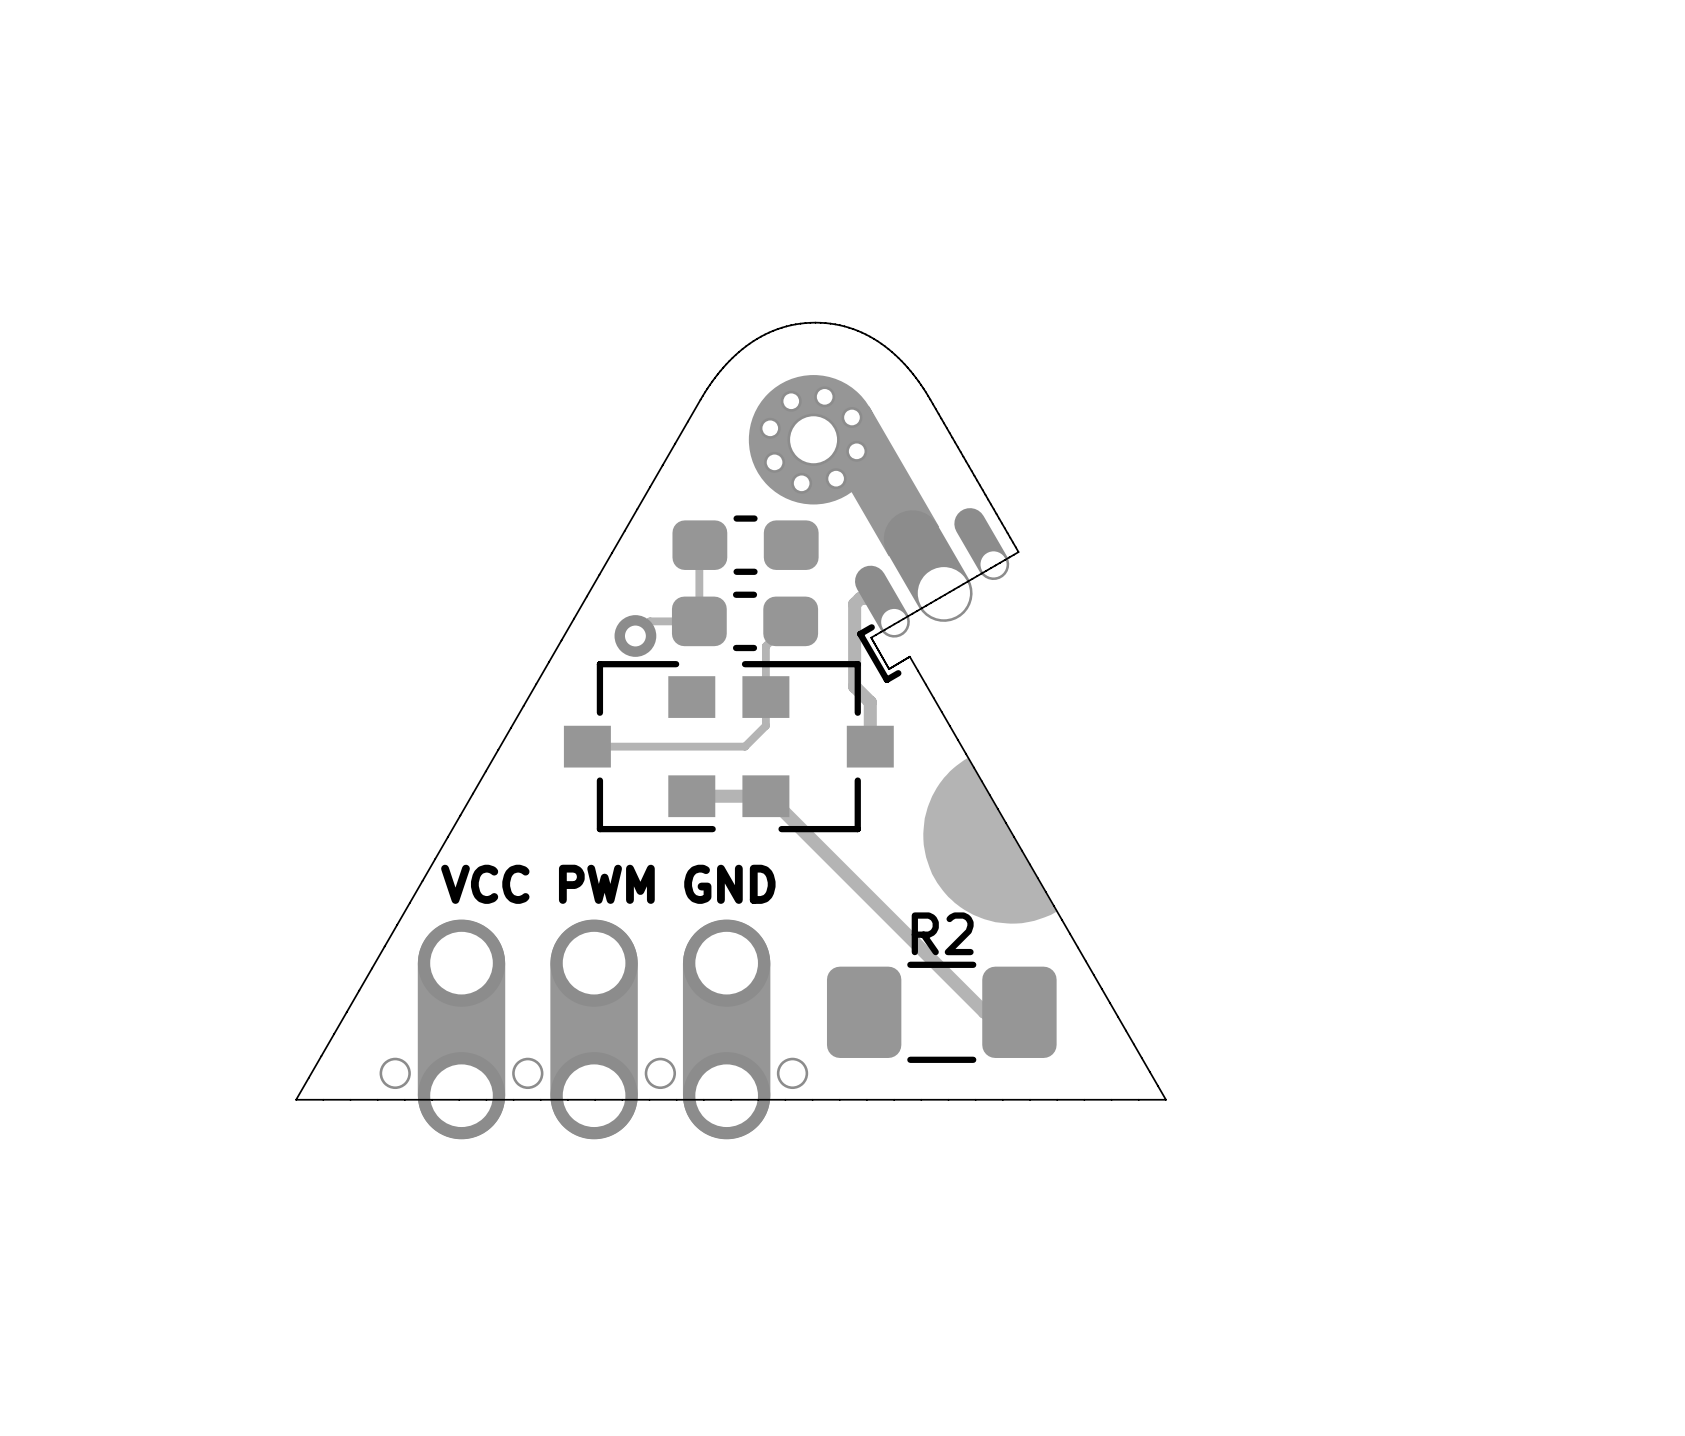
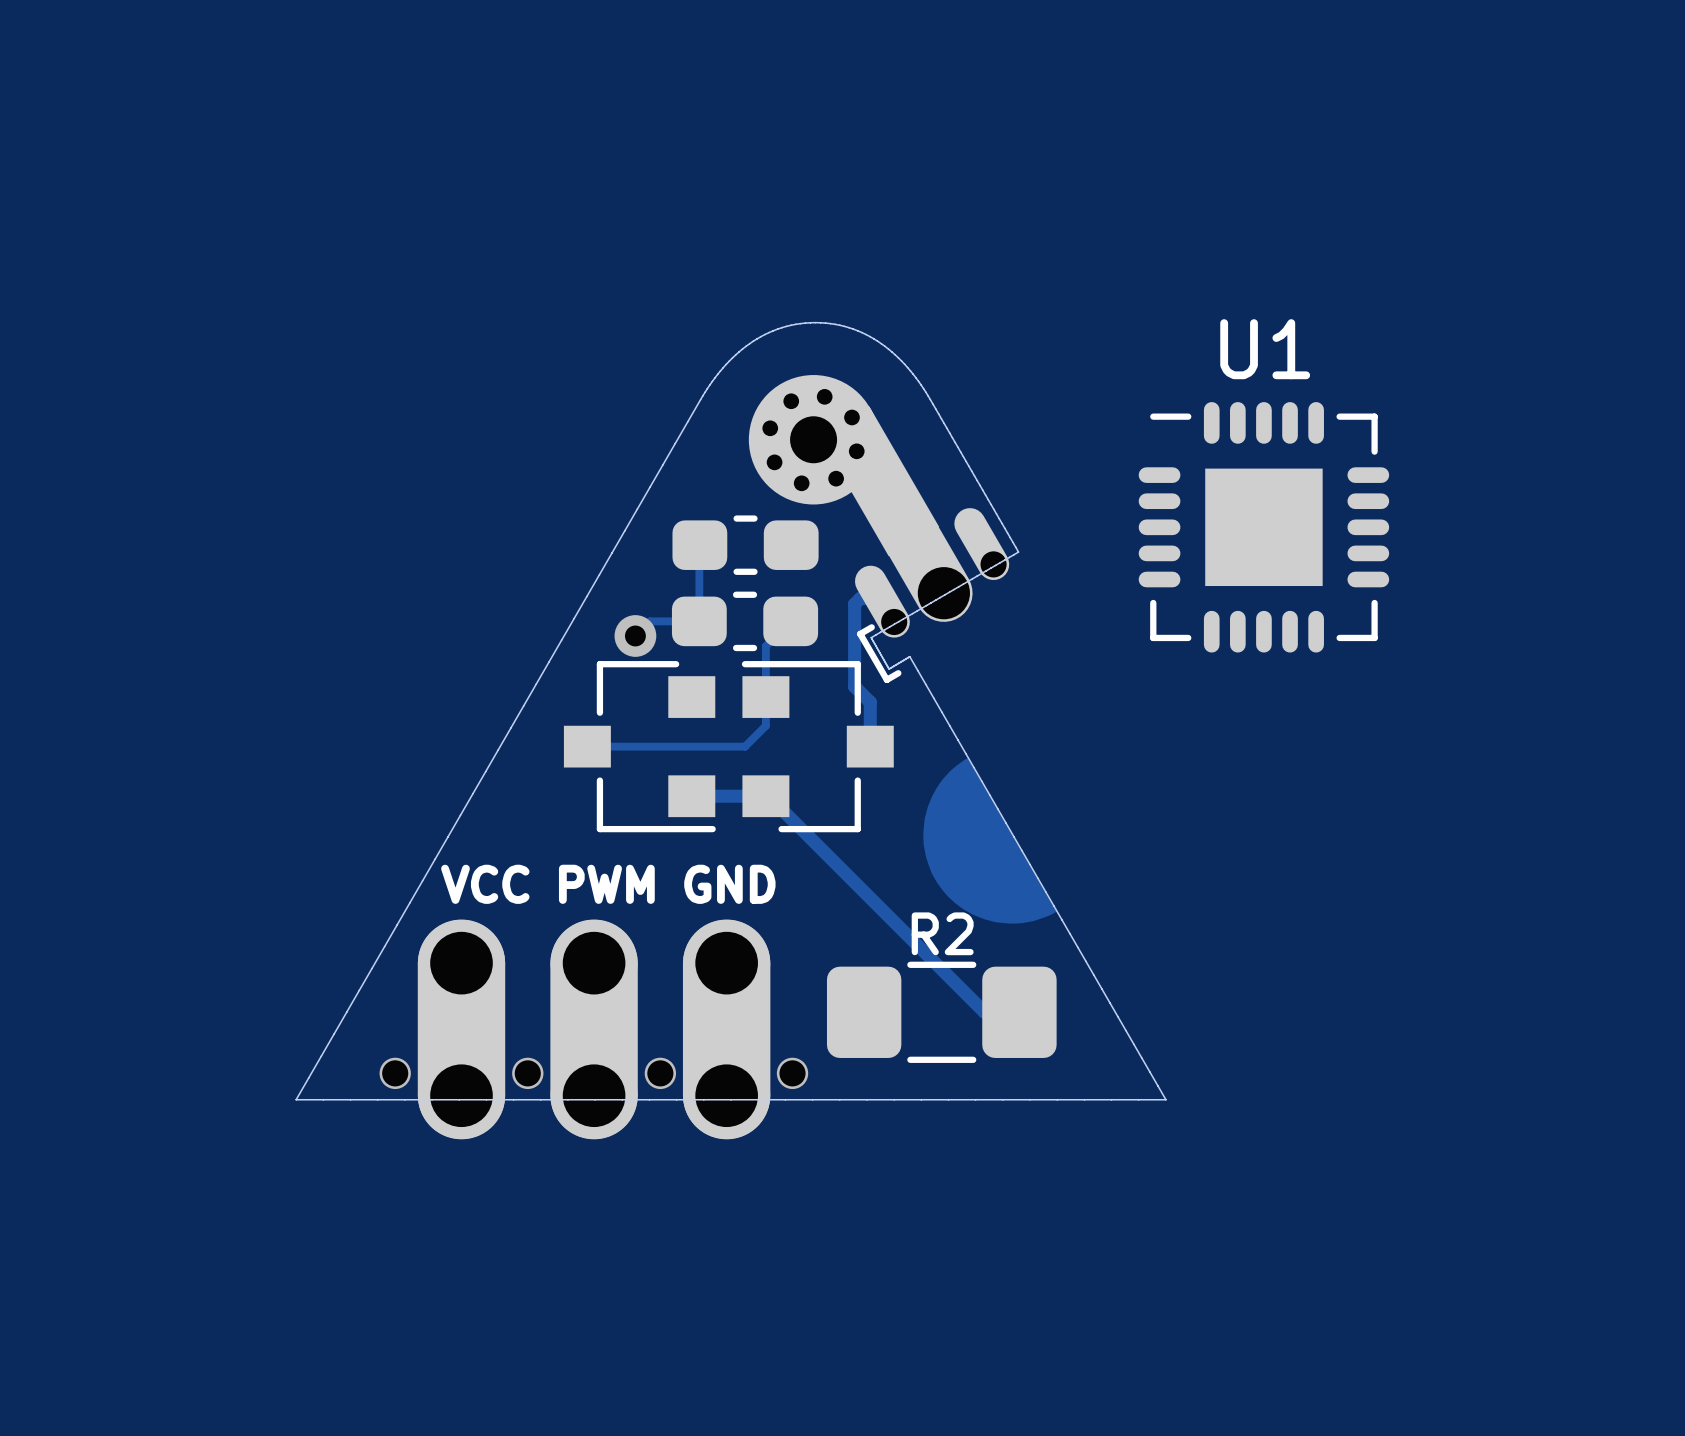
U1: none -> (1263, 527)

